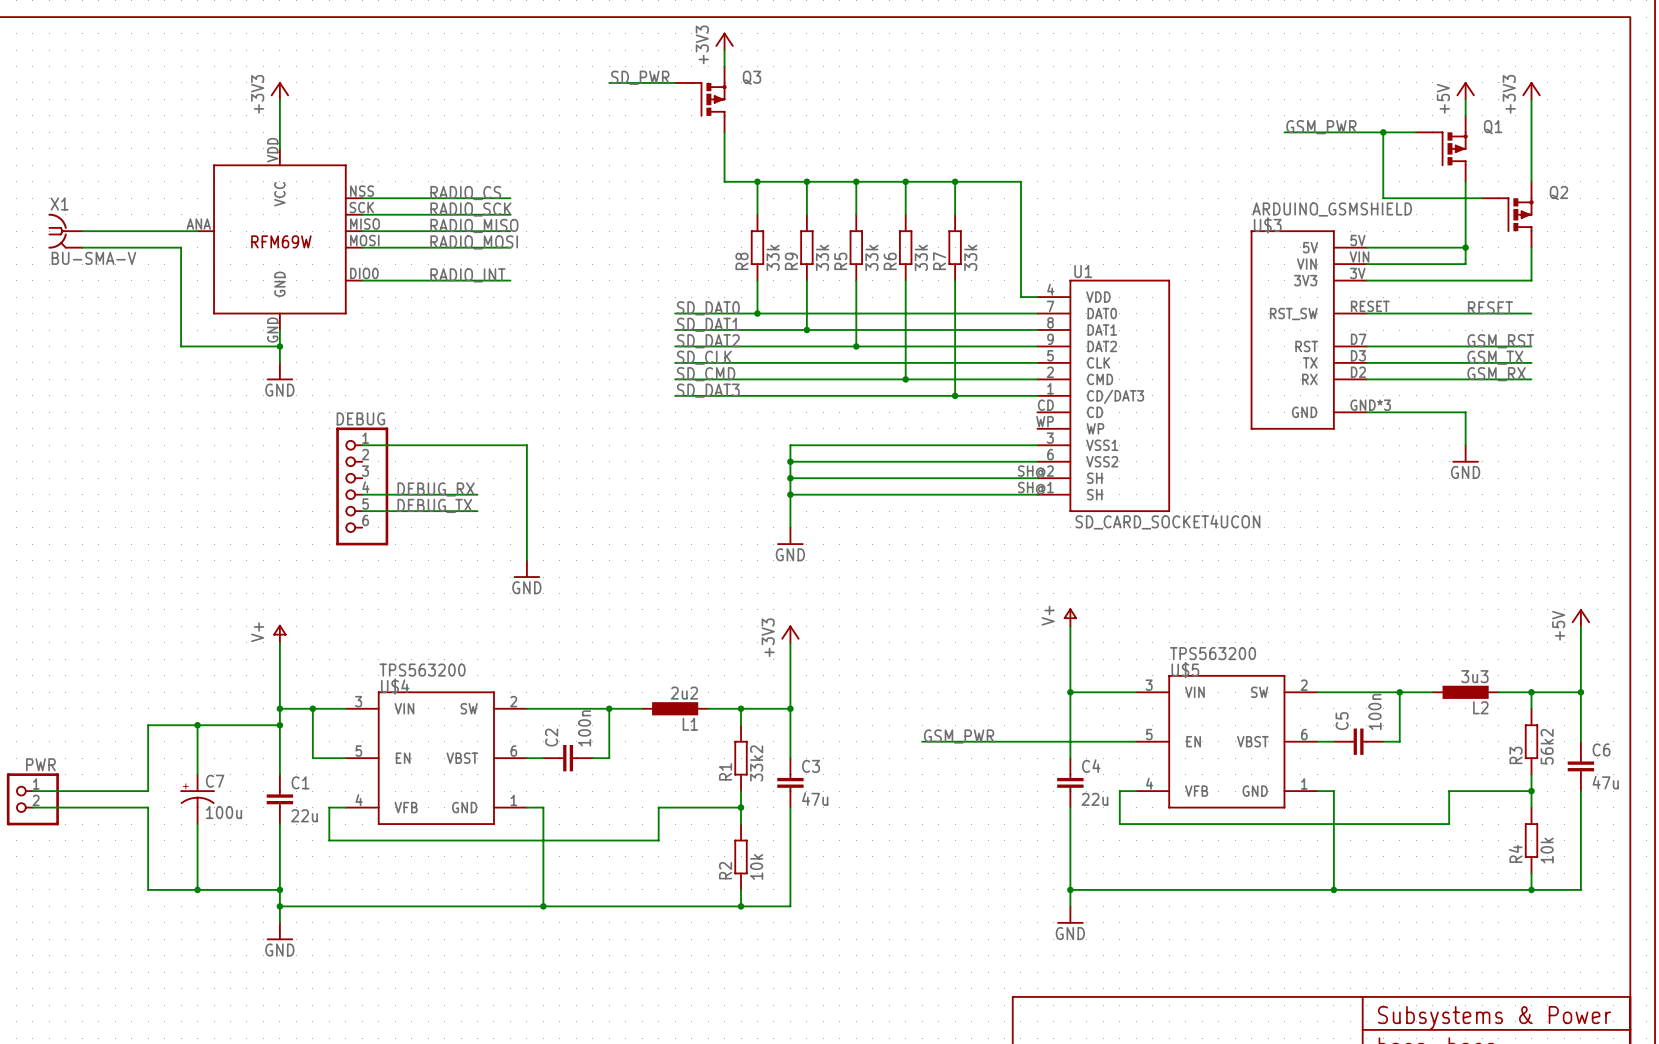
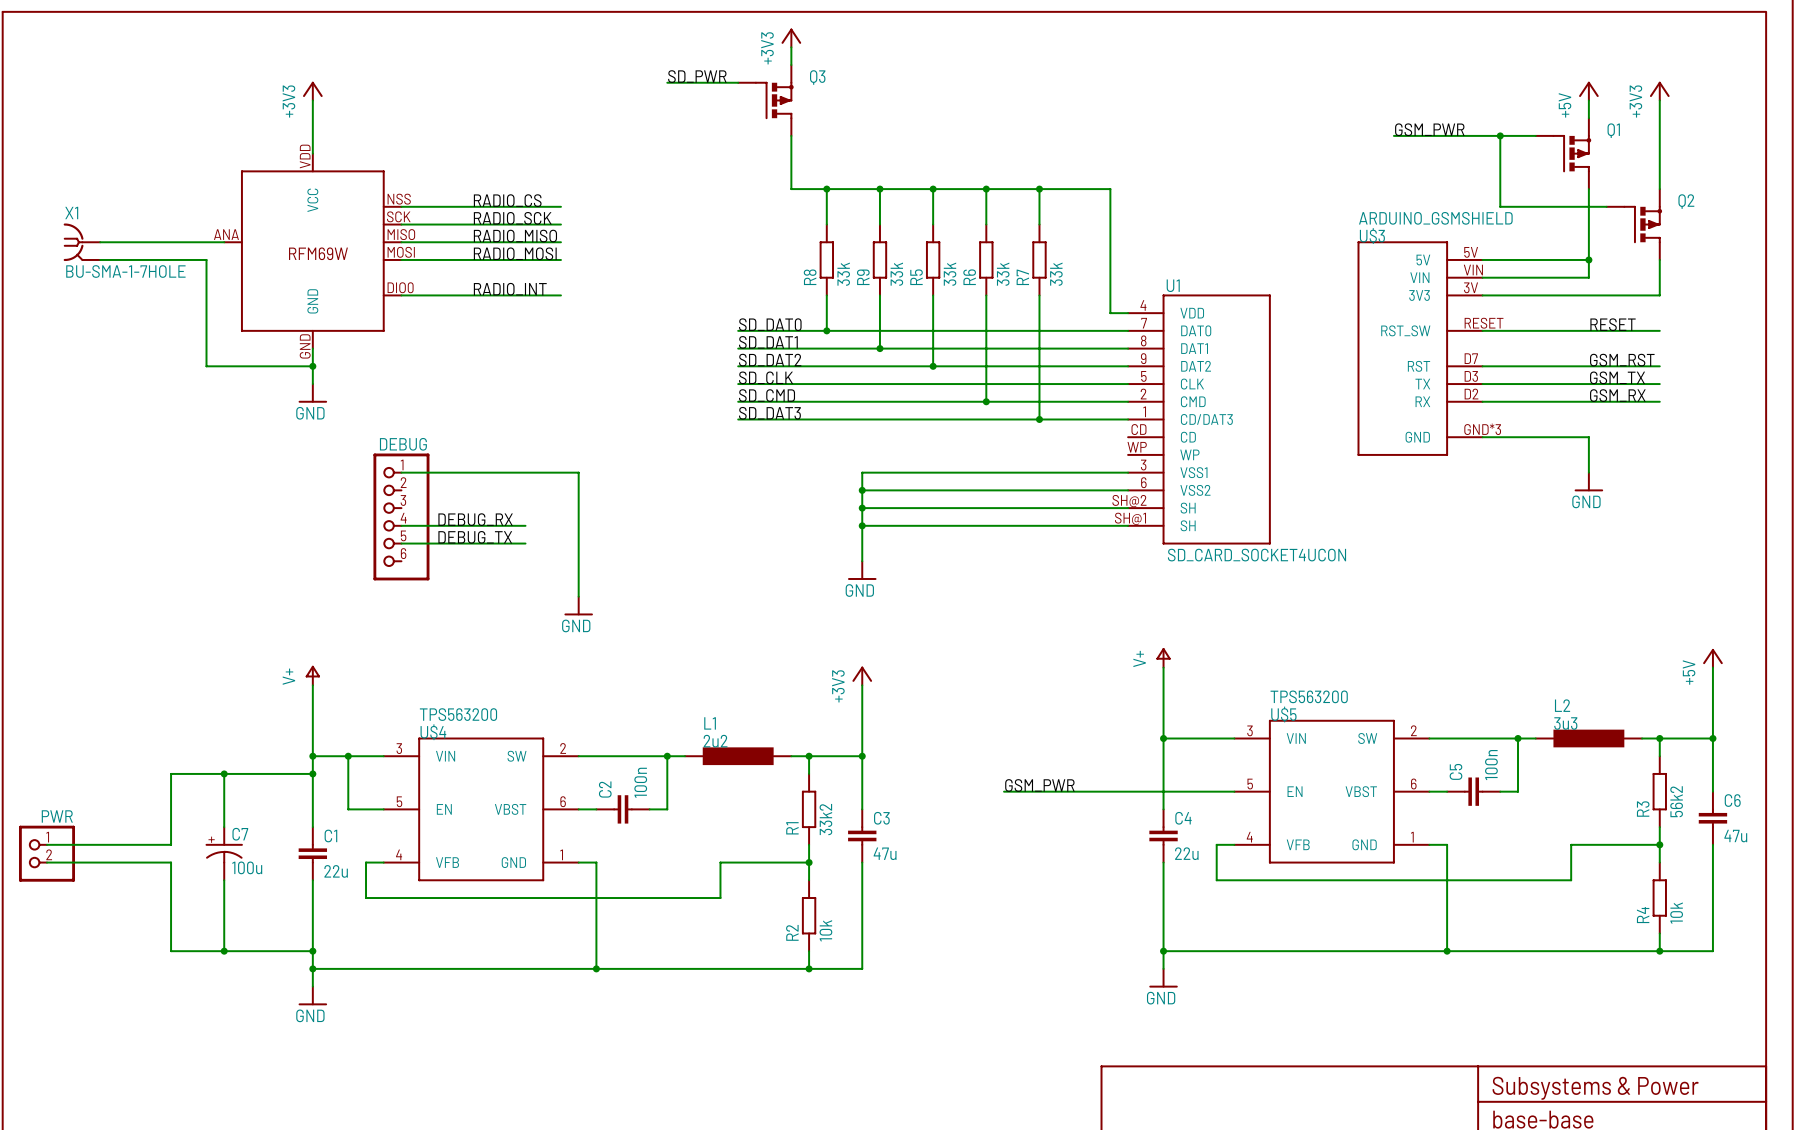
X1 value: BU-SMA-V (93, 258) -> BU-SMA-1-7HOLE (125, 271)
L2 value position: 3u3 (1474, 676) -> 3u3 (1565, 723)
L2 symbol: [1432, 685, 1499, 699] -> [1534, 729, 1643, 748]
L1 value position: 2u2 (684, 693) -> 2u2 (715, 741)
L1 symbol: [642, 702, 709, 716] -> [684, 747, 793, 766]
L2 name position: L2 (1480, 707) -> L2 (1562, 705)
L1 name position: L1 (690, 724) -> L1 (710, 723)

